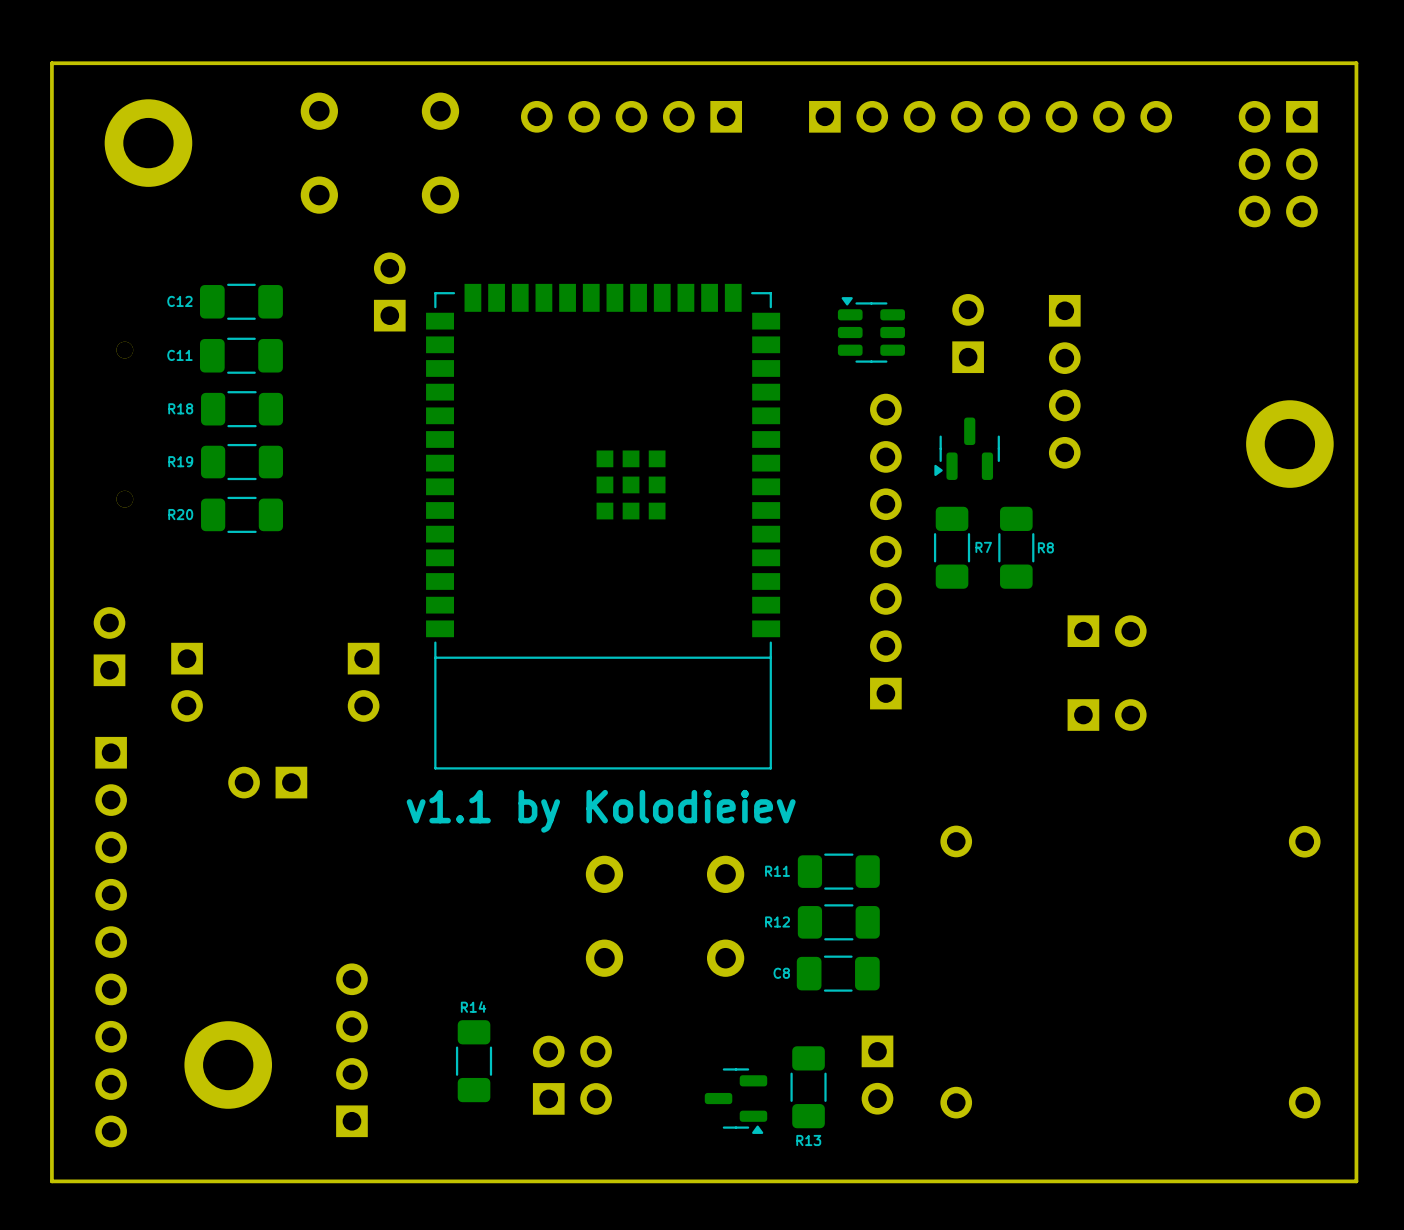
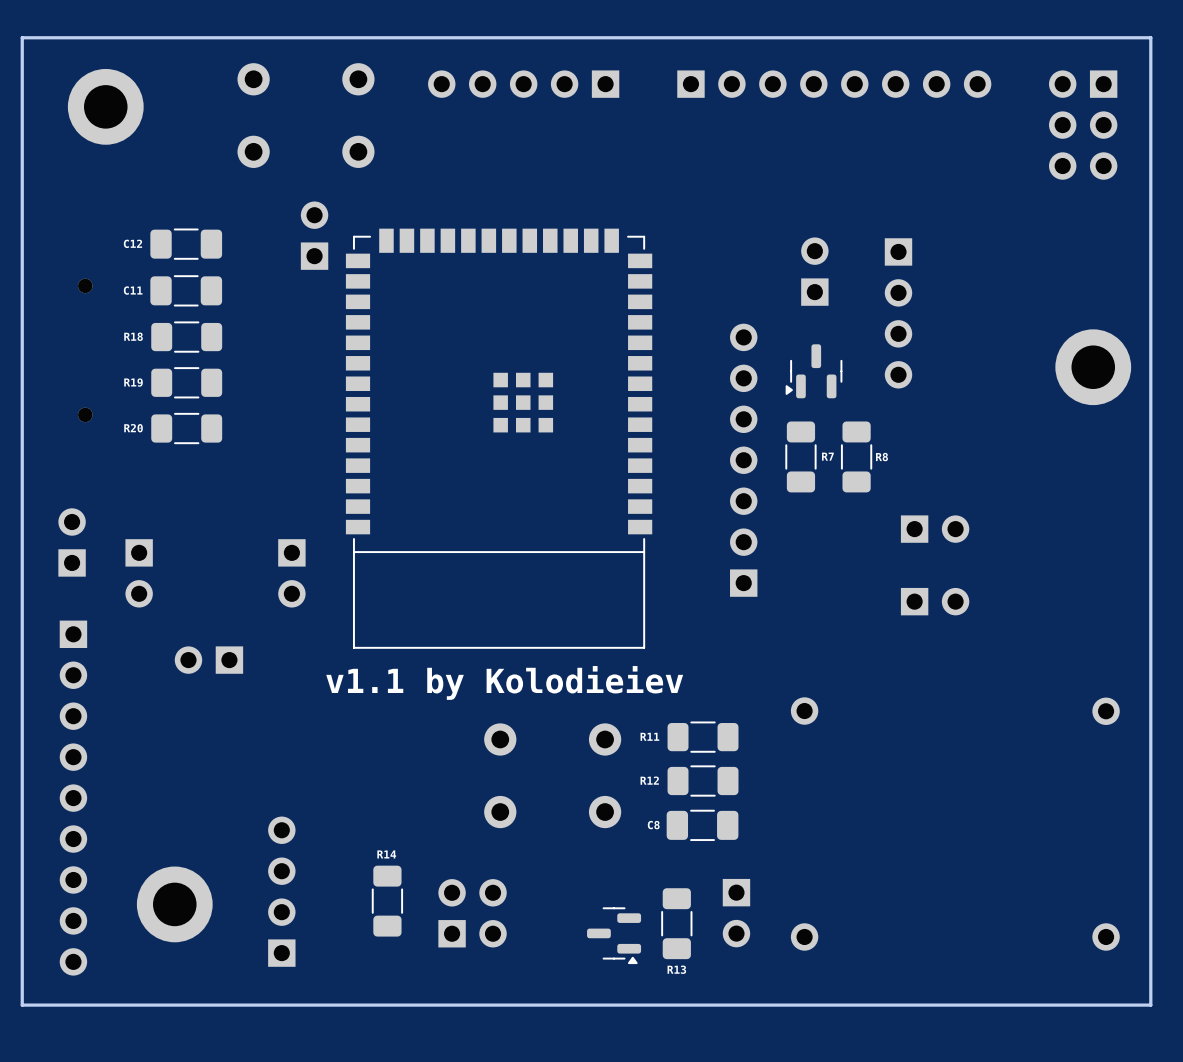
part: (871, 329) -> none

